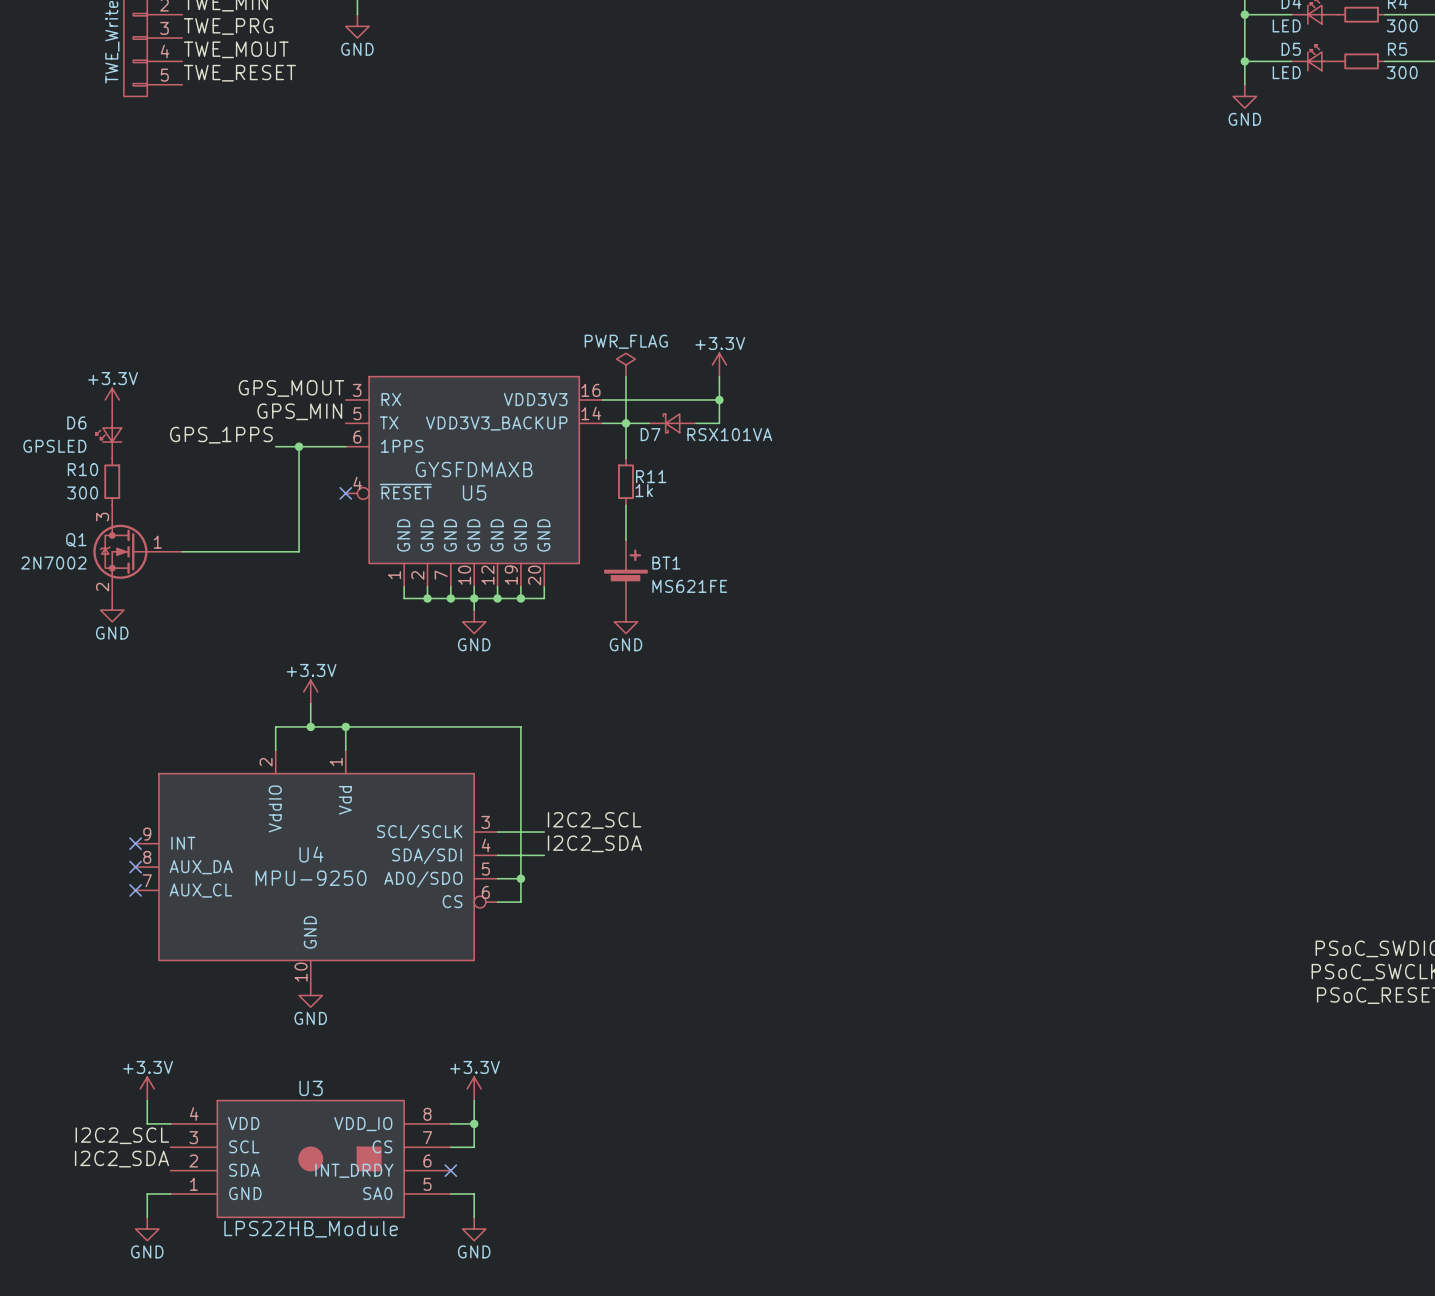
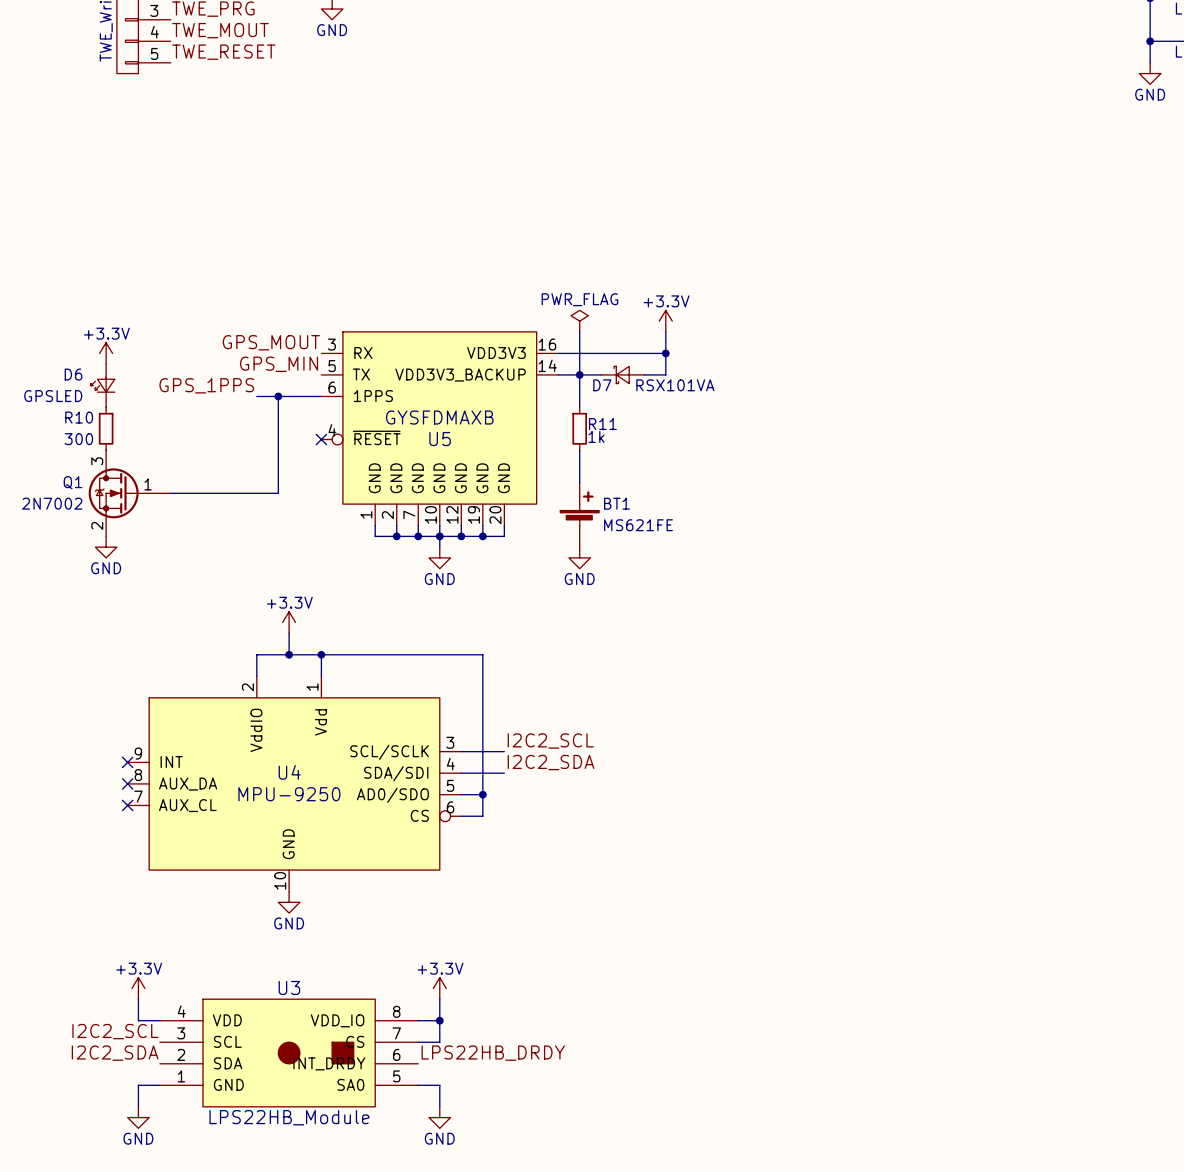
label: none -> LPS22HB_DRDY (493, 1053)
no-connect mark: (450, 1170) -> none

